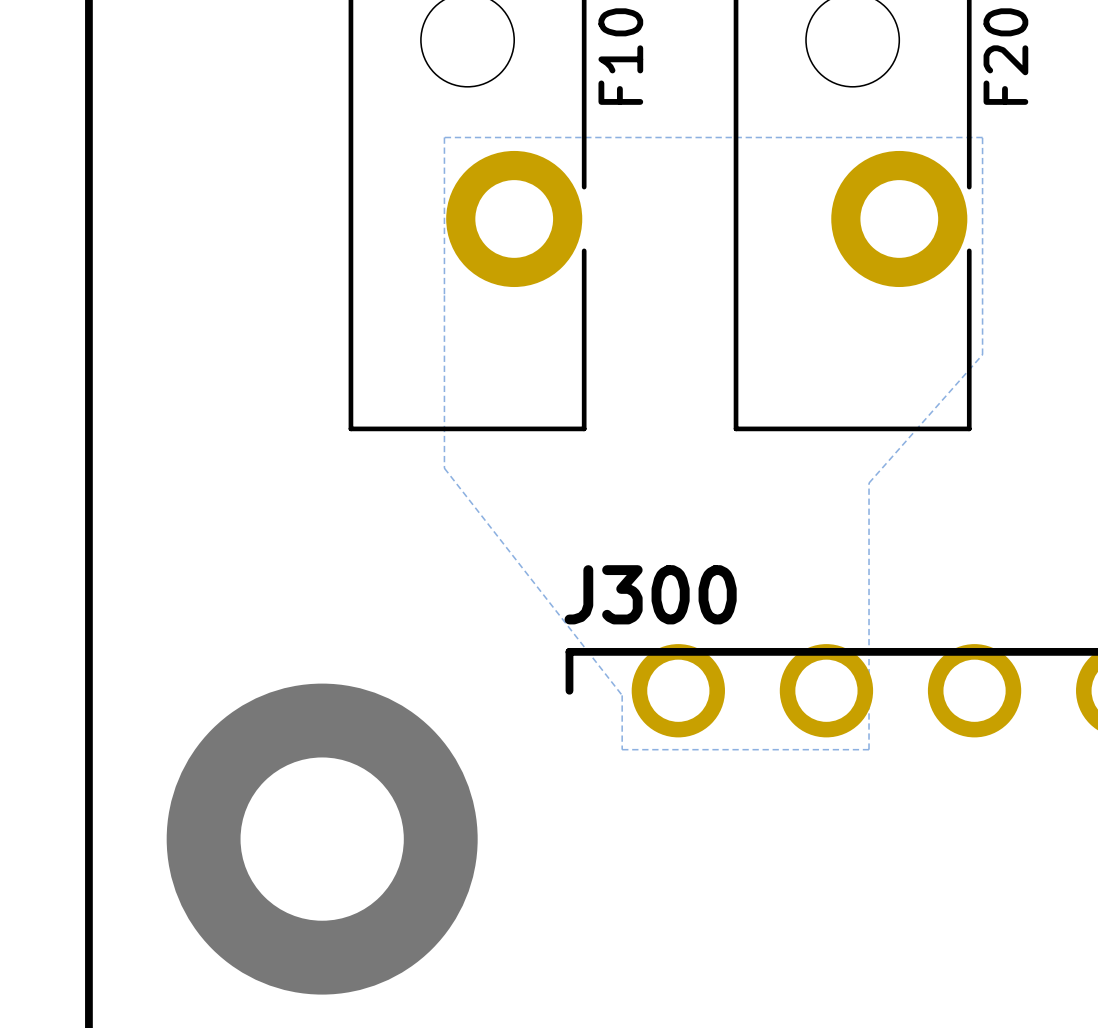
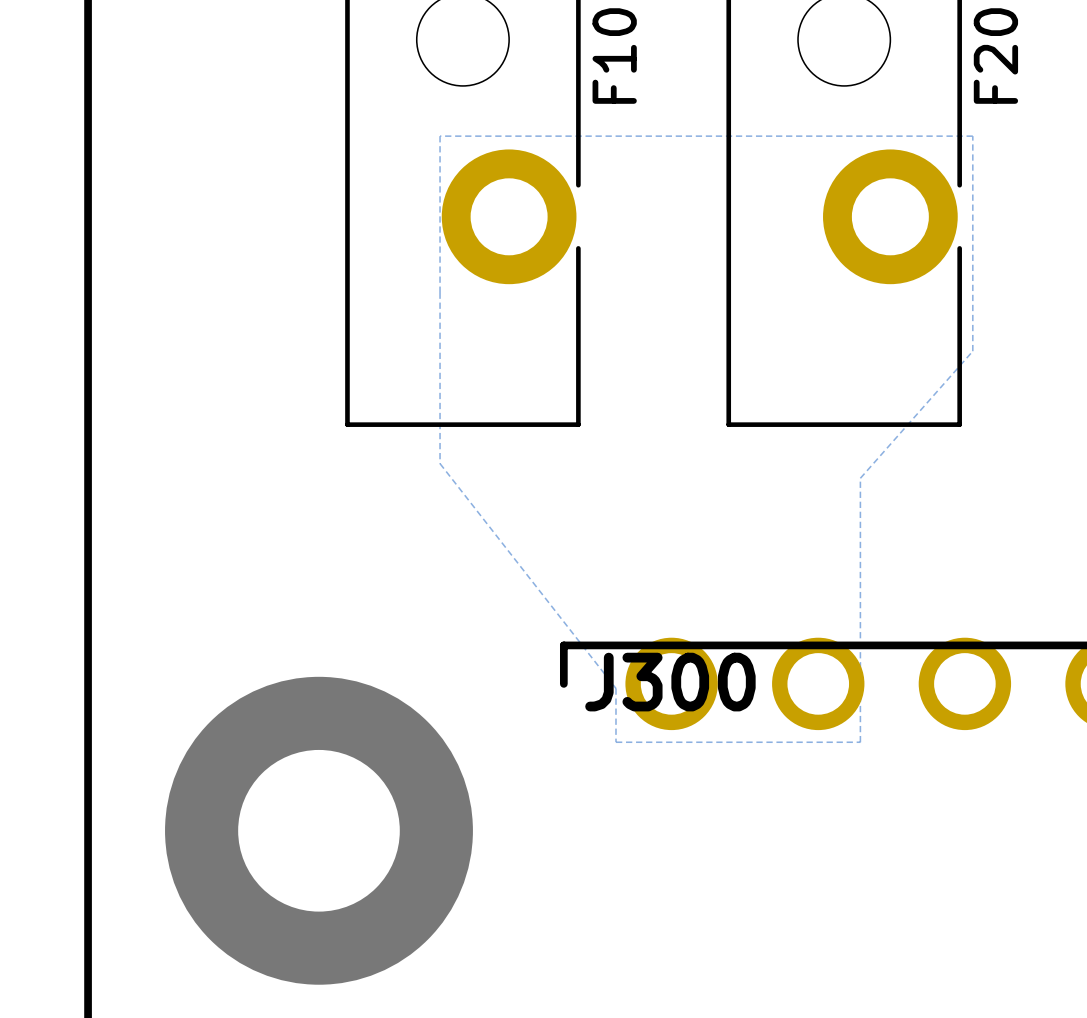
J300 name position: J300 (650, 594) -> J300 (670, 682)

